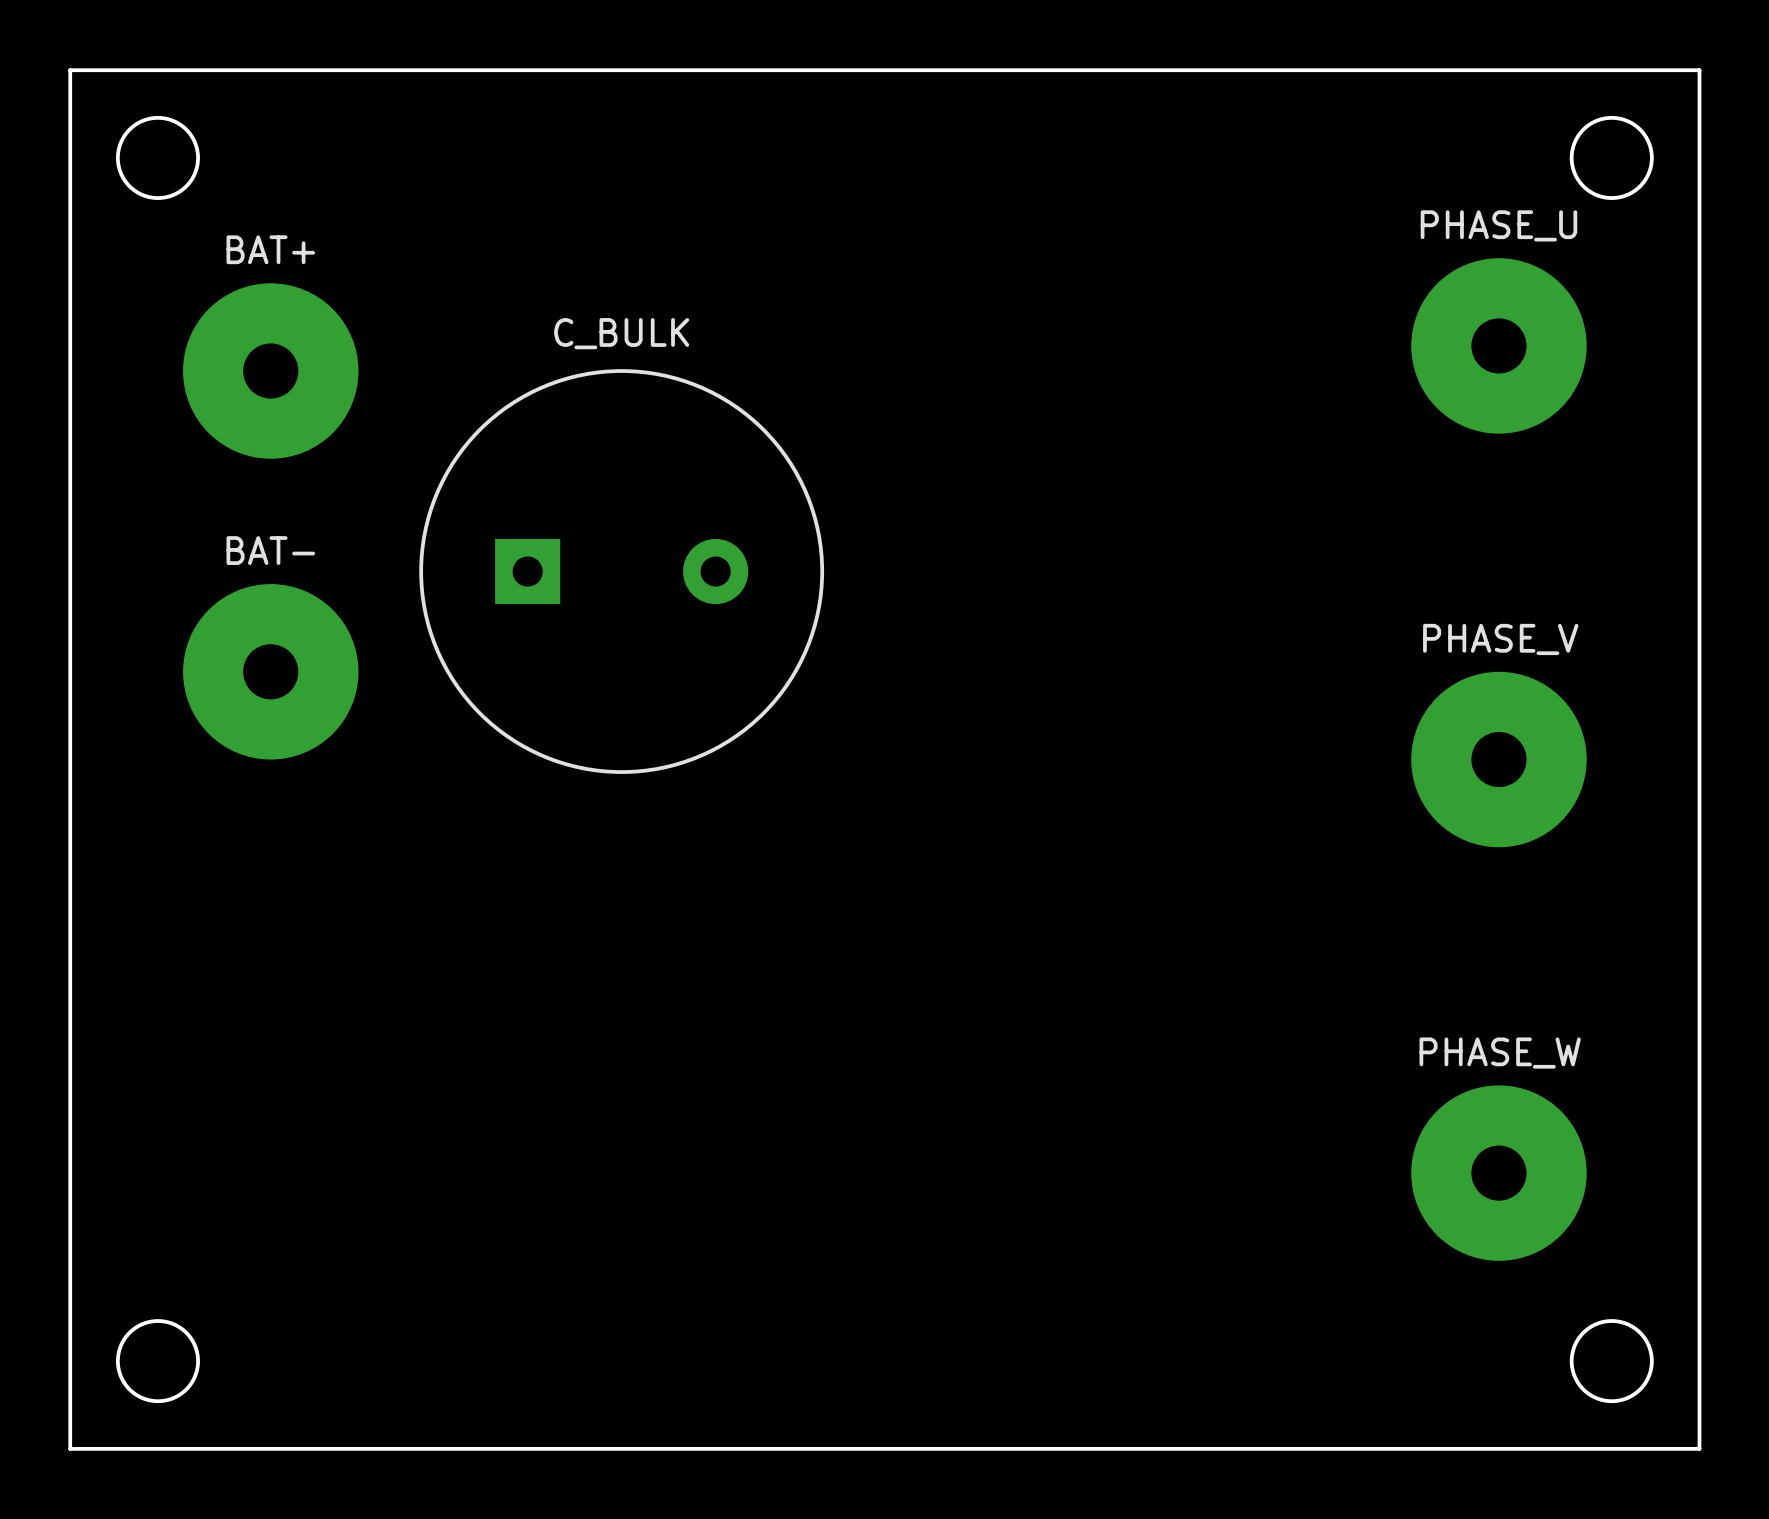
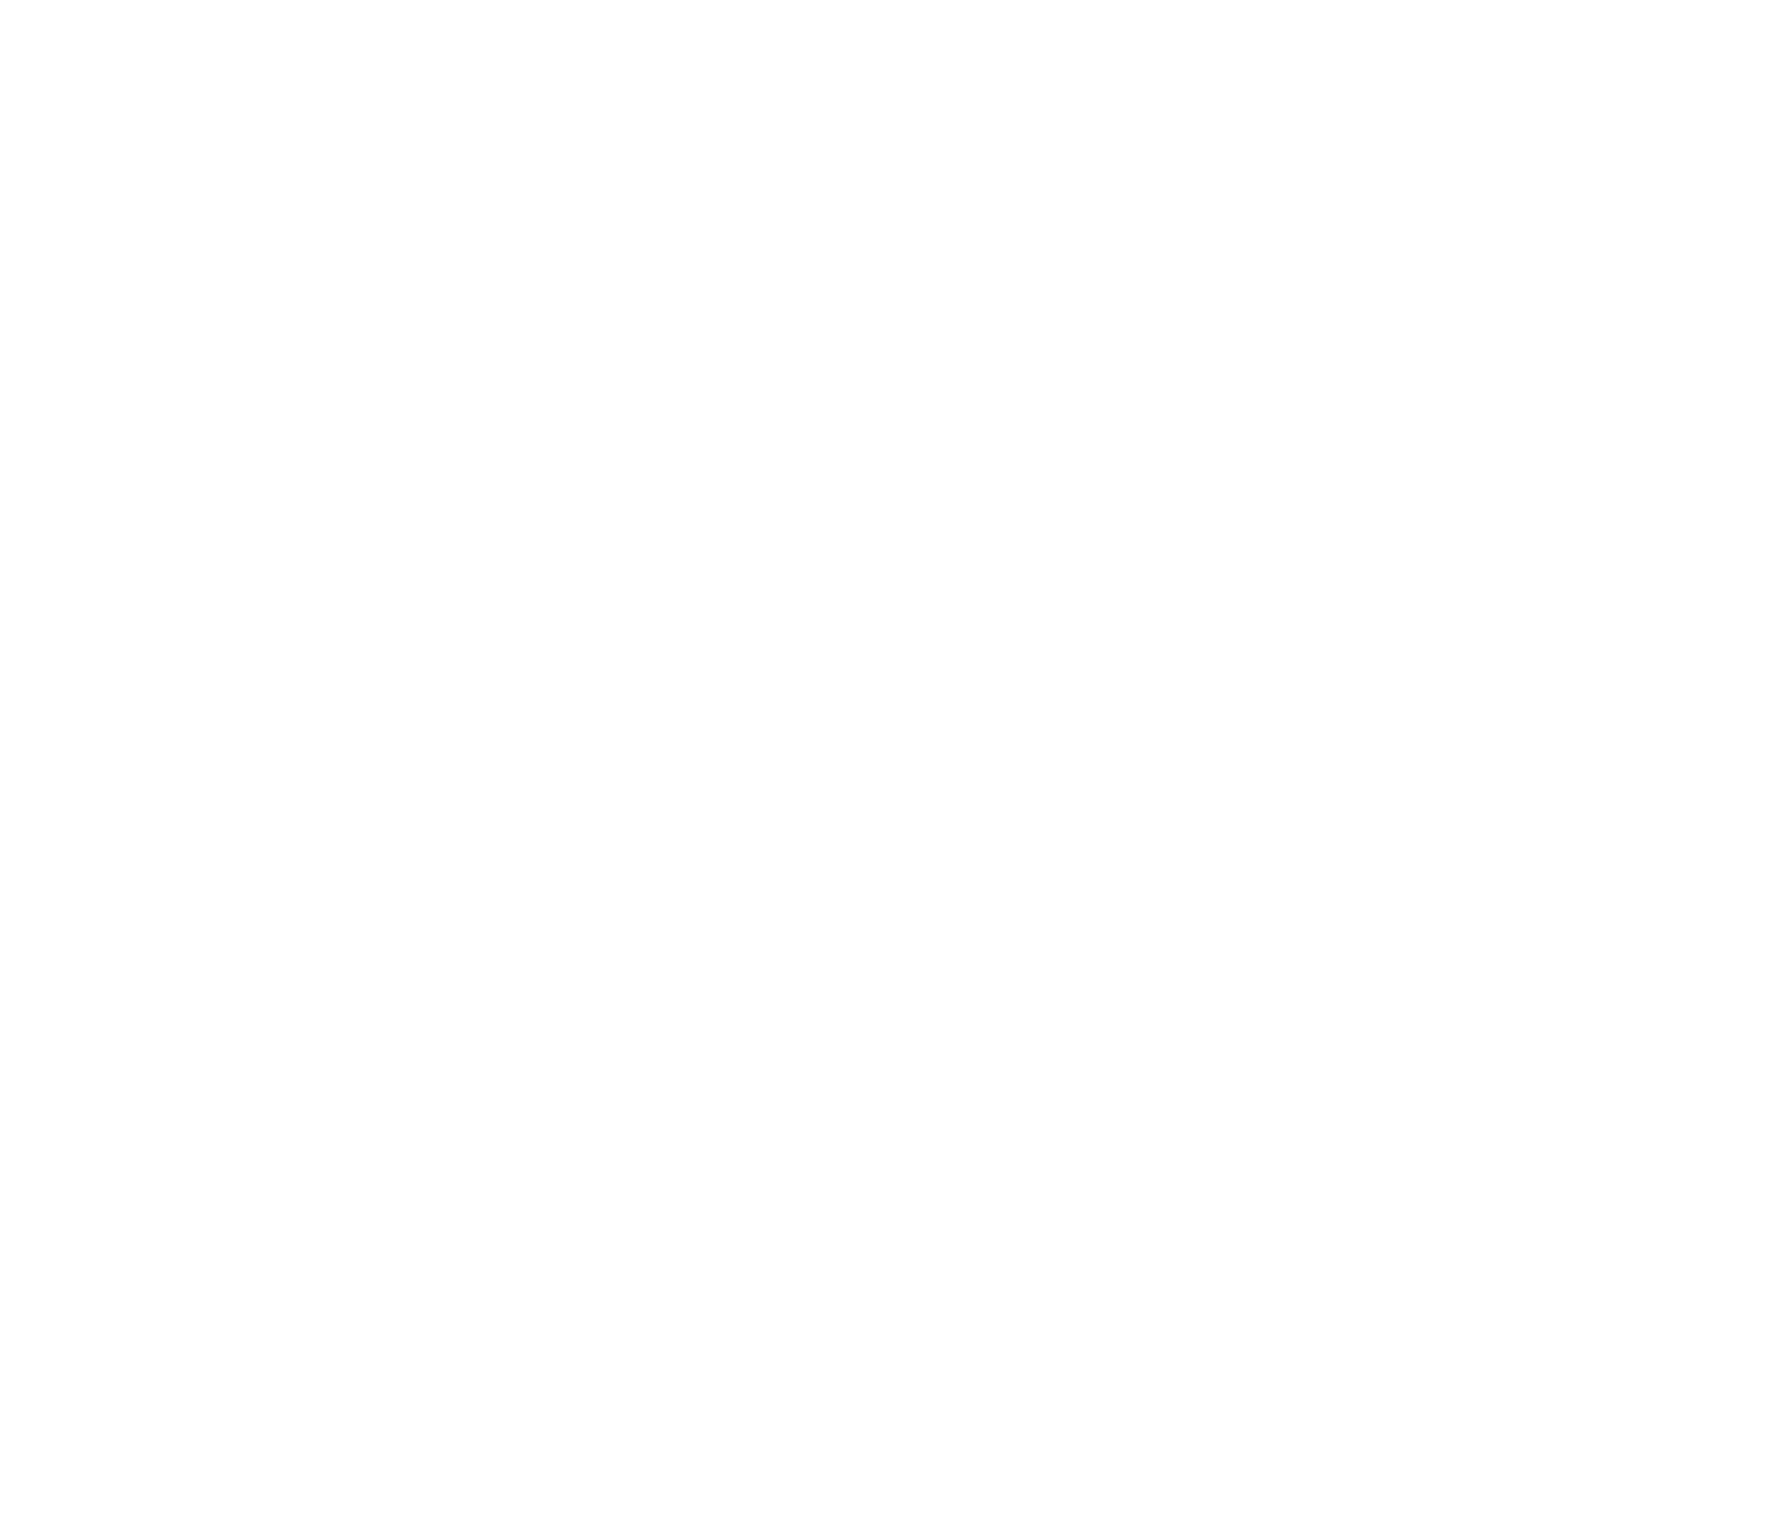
board edge: (70, 70) (1699, 70) (1699, 1448) (70, 1448) (70, 70) -> none
round board edge: [115, 115, 200, 200] -> none
round board edge: [1569, 115, 1654, 200] -> none
PHASE_U: (1498, 345) -> none
BAT+: (270, 371) -> none
C_BULK: (621, 571) -> none
BAT-: (270, 671) -> none
PHASE_V: (1498, 759) -> none
PHASE_W: (1498, 1173) -> none
round board edge: [115, 1319, 200, 1404] -> none
round board edge: [1569, 1319, 1654, 1404] -> none

